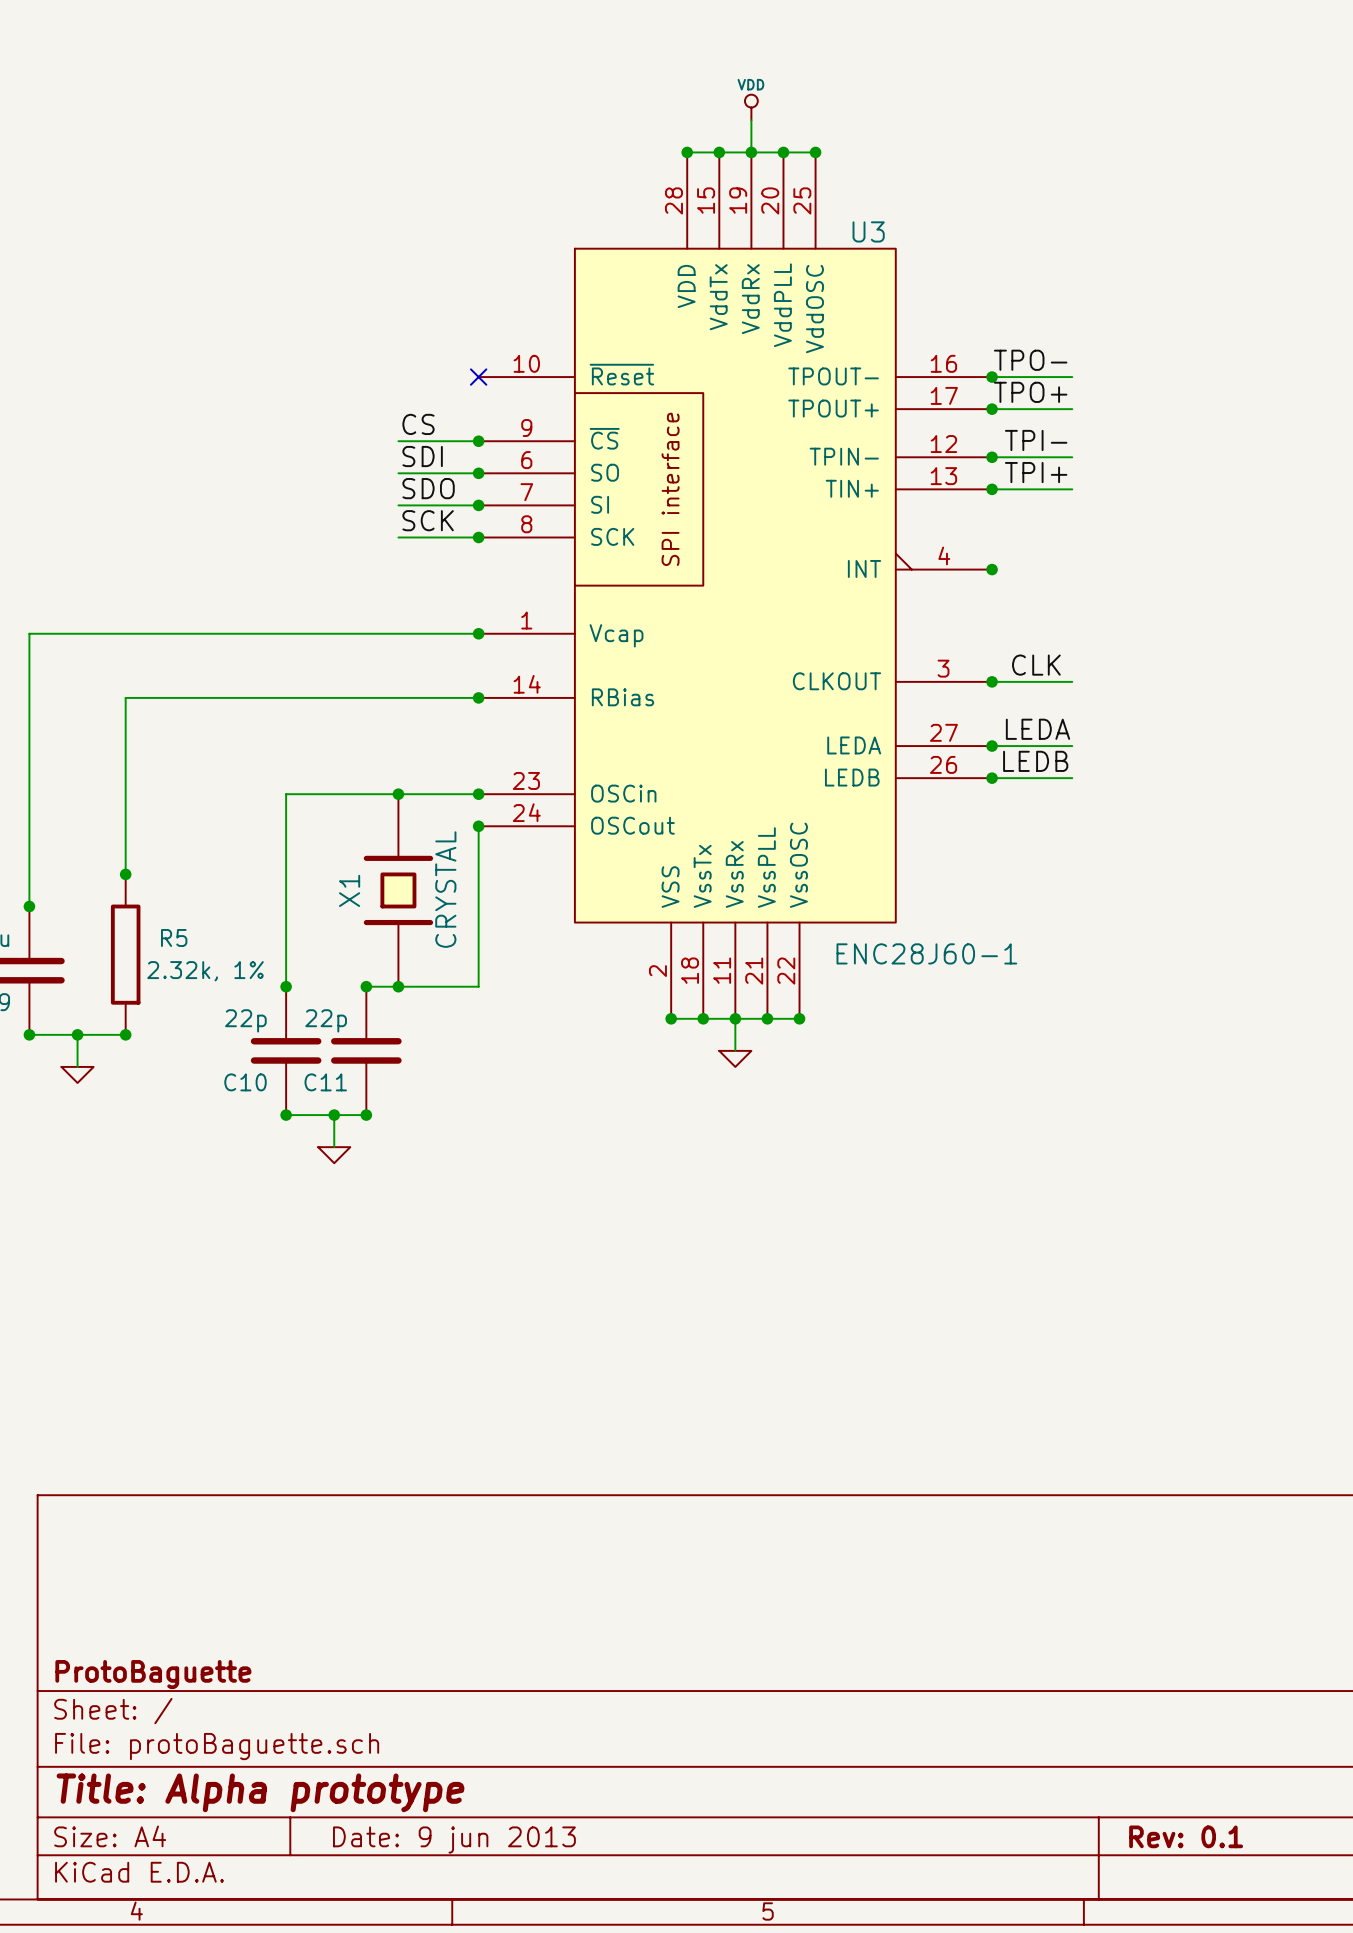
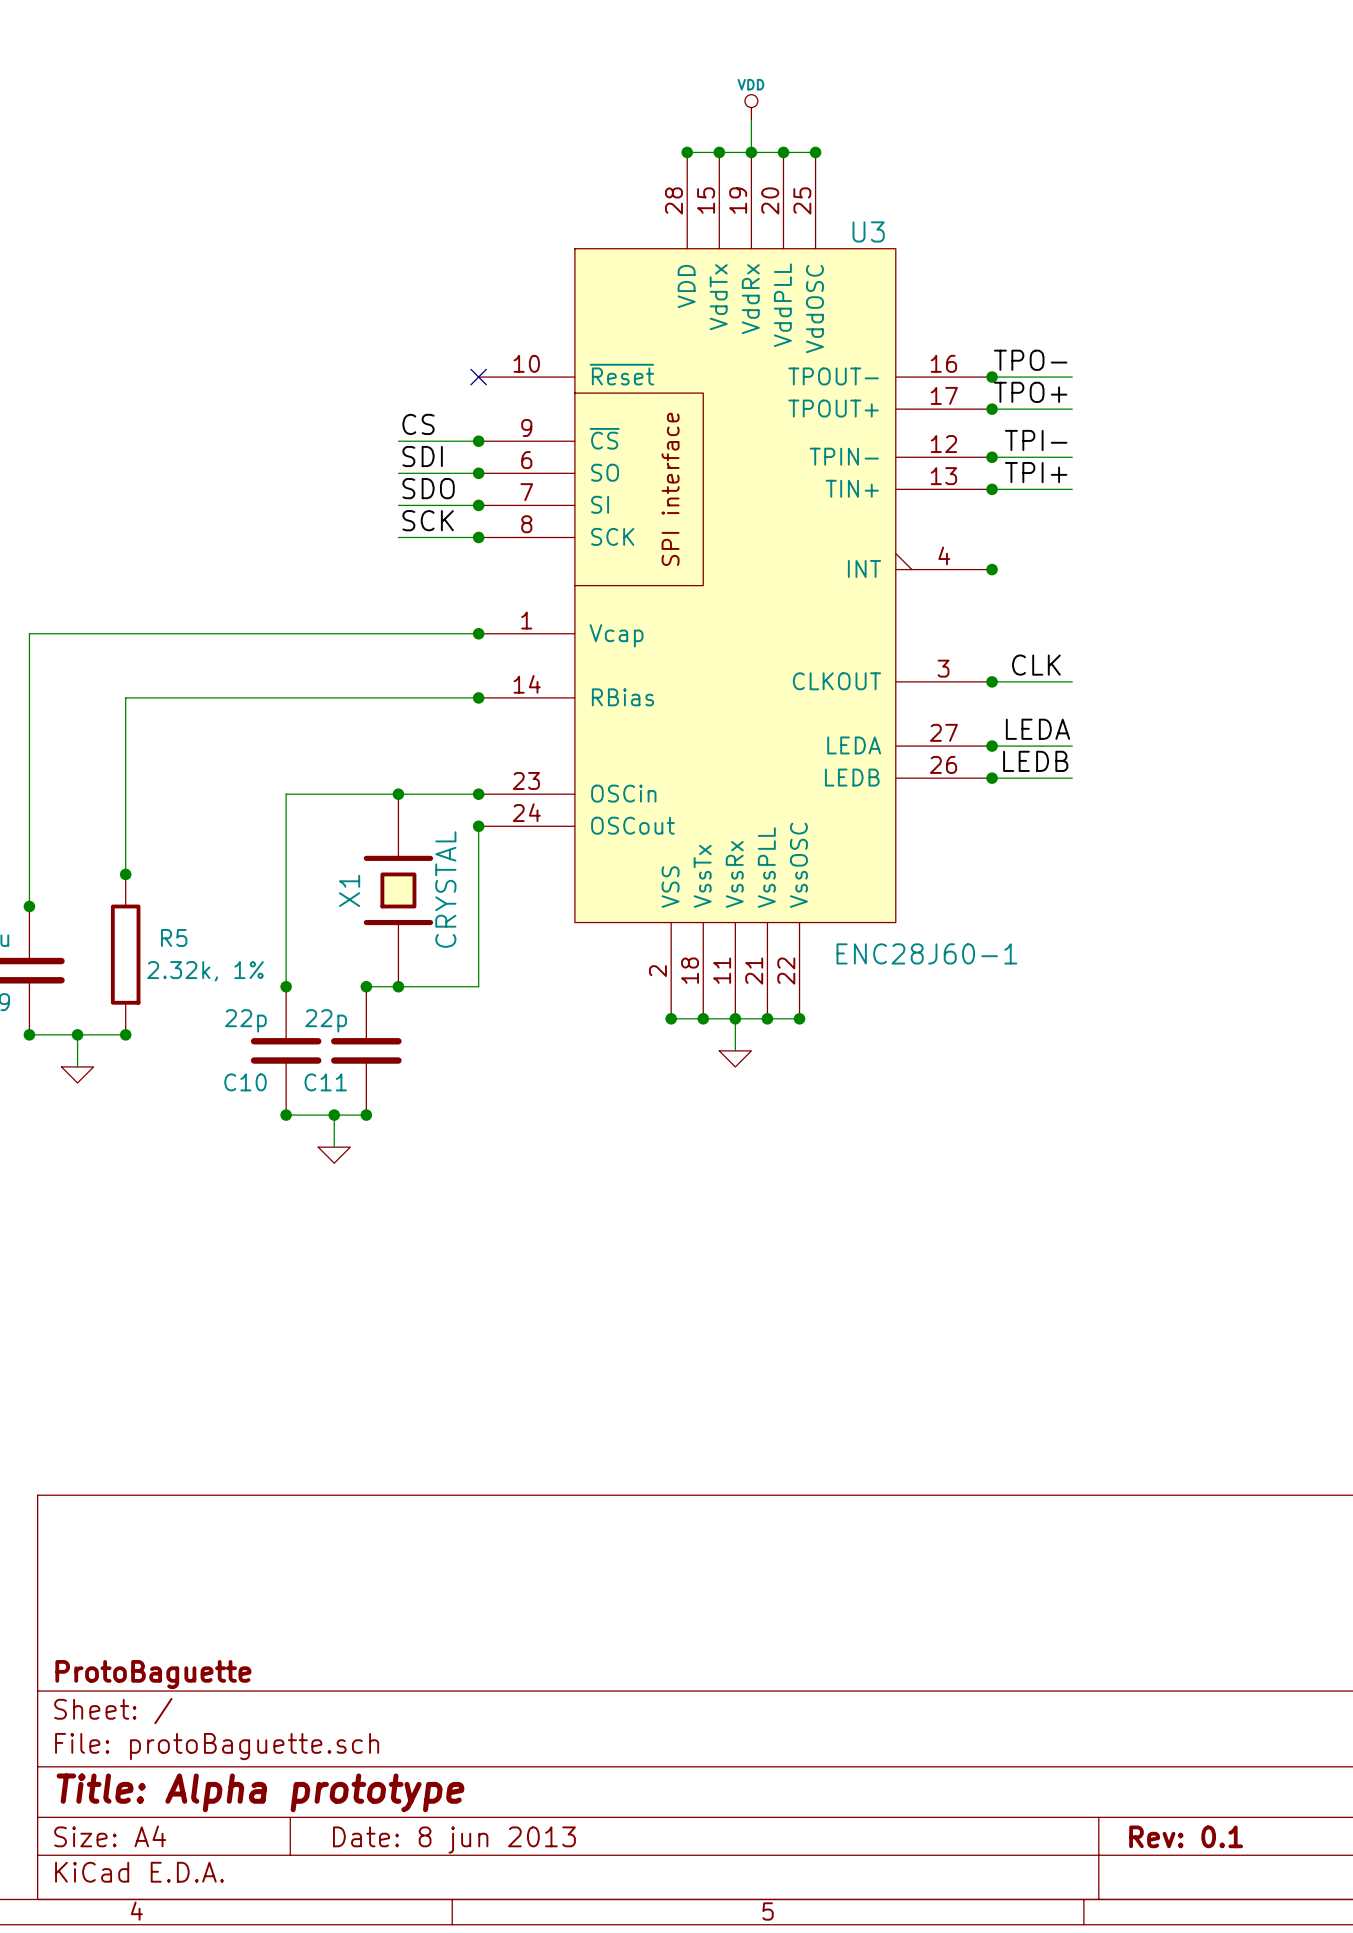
title block: Date: 9 jun 2013 (454, 1840) -> Date: 8 jun 2013 (454, 1840)

